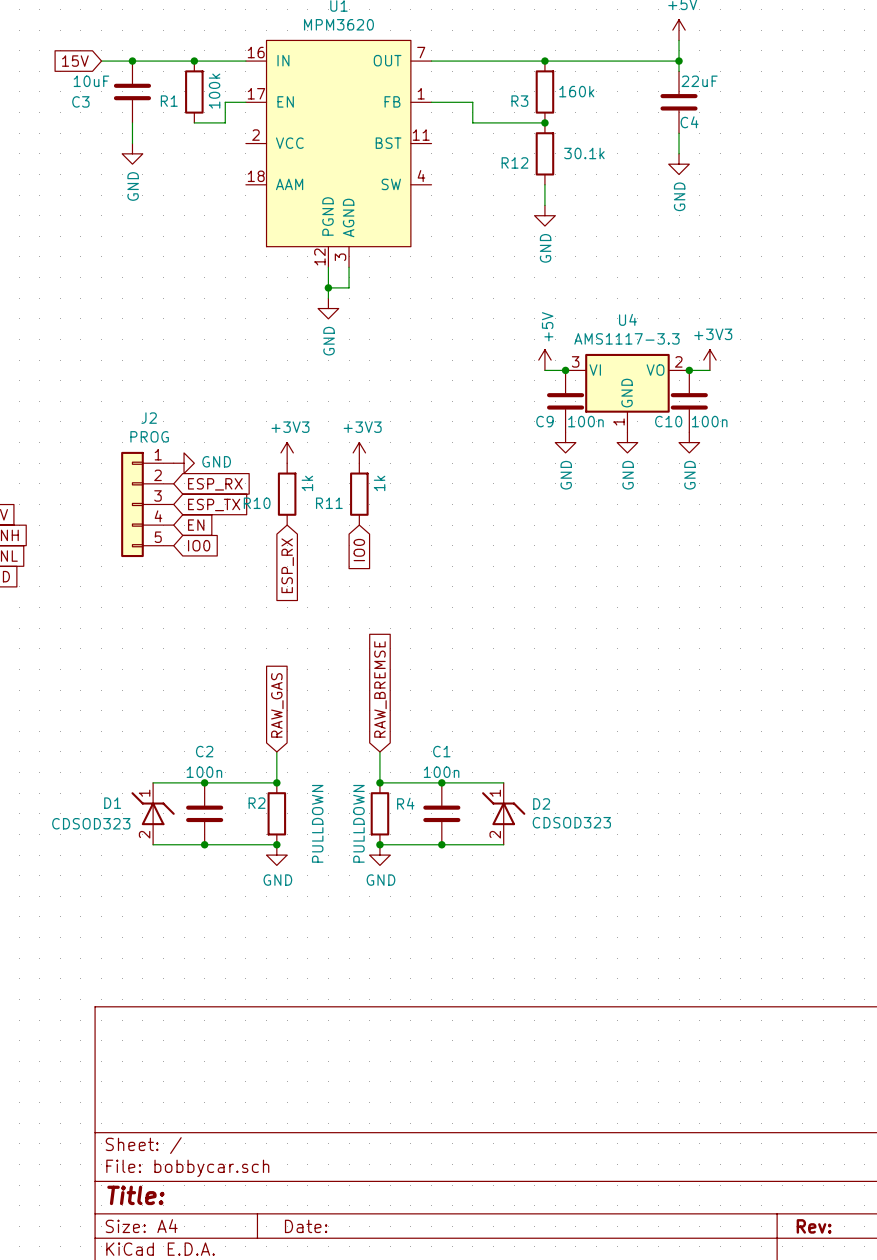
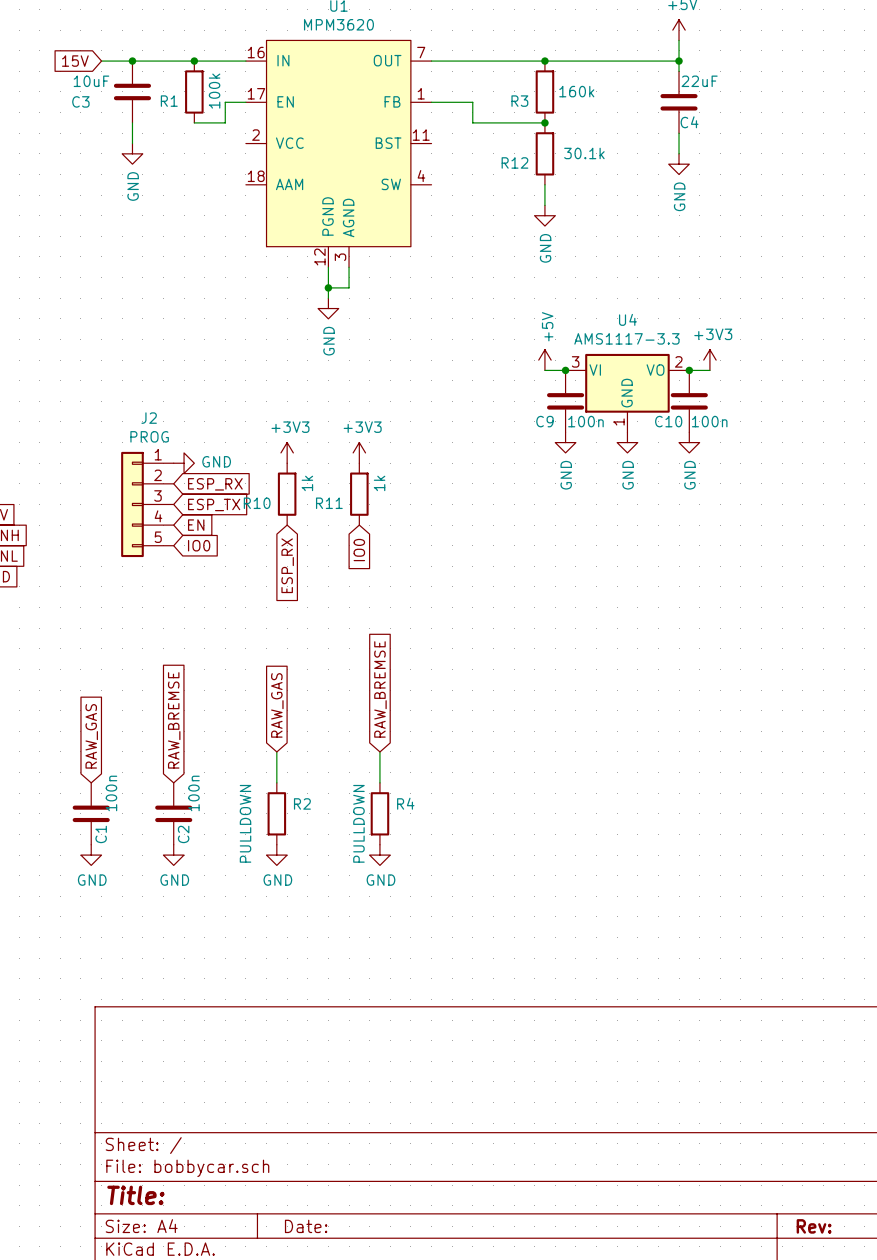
global label: none -> RAW_BREMSE (174, 720)
global label: none -> RAW_GAS (91, 736)
C2 name rotation: 0° (204, 751) -> 90° counterclockwise (183, 834)
C2 name position: C2 (204, 751) -> C2 (183, 834)
C1 name rotation: 0° (441, 751) -> 90° counterclockwise (101, 834)
C1 name position: C1 (441, 751) -> C1 (101, 834)
C2 value rotation: 0° (204, 772) -> 90° counterclockwise (193, 793)
C1 value rotation: 0° (441, 772) -> 90° counterclockwise (111, 793)
wire: (153, 782) (276, 782) -> none
junction: (204, 782) -> none
junction: (276, 782) -> none
wire: (379, 782) (503, 782) -> none
junction: (379, 782) -> none
junction: (441, 782) -> none
R2 name position: R2 (257, 803) -> R2 (302, 803)
D1: CDSOD323 (153, 813) -> none
C2 position: (204, 813) -> (173, 813)
C1 position: (441, 813) -> (91, 813)
D2: CDSOD323 (503, 813) -> none
R2 value position: PULLDOWN (317, 823) -> PULLDOWN (245, 823)
wire: (153, 844) (276, 844) -> none
junction: (204, 844) -> none
junction: (276, 844) -> none
wire: (379, 844) (503, 844) -> none
junction: (379, 844) -> none
junction: (441, 844) -> none
power symbol: none -> GND (91, 855)
power symbol: none -> GND (173, 855)

